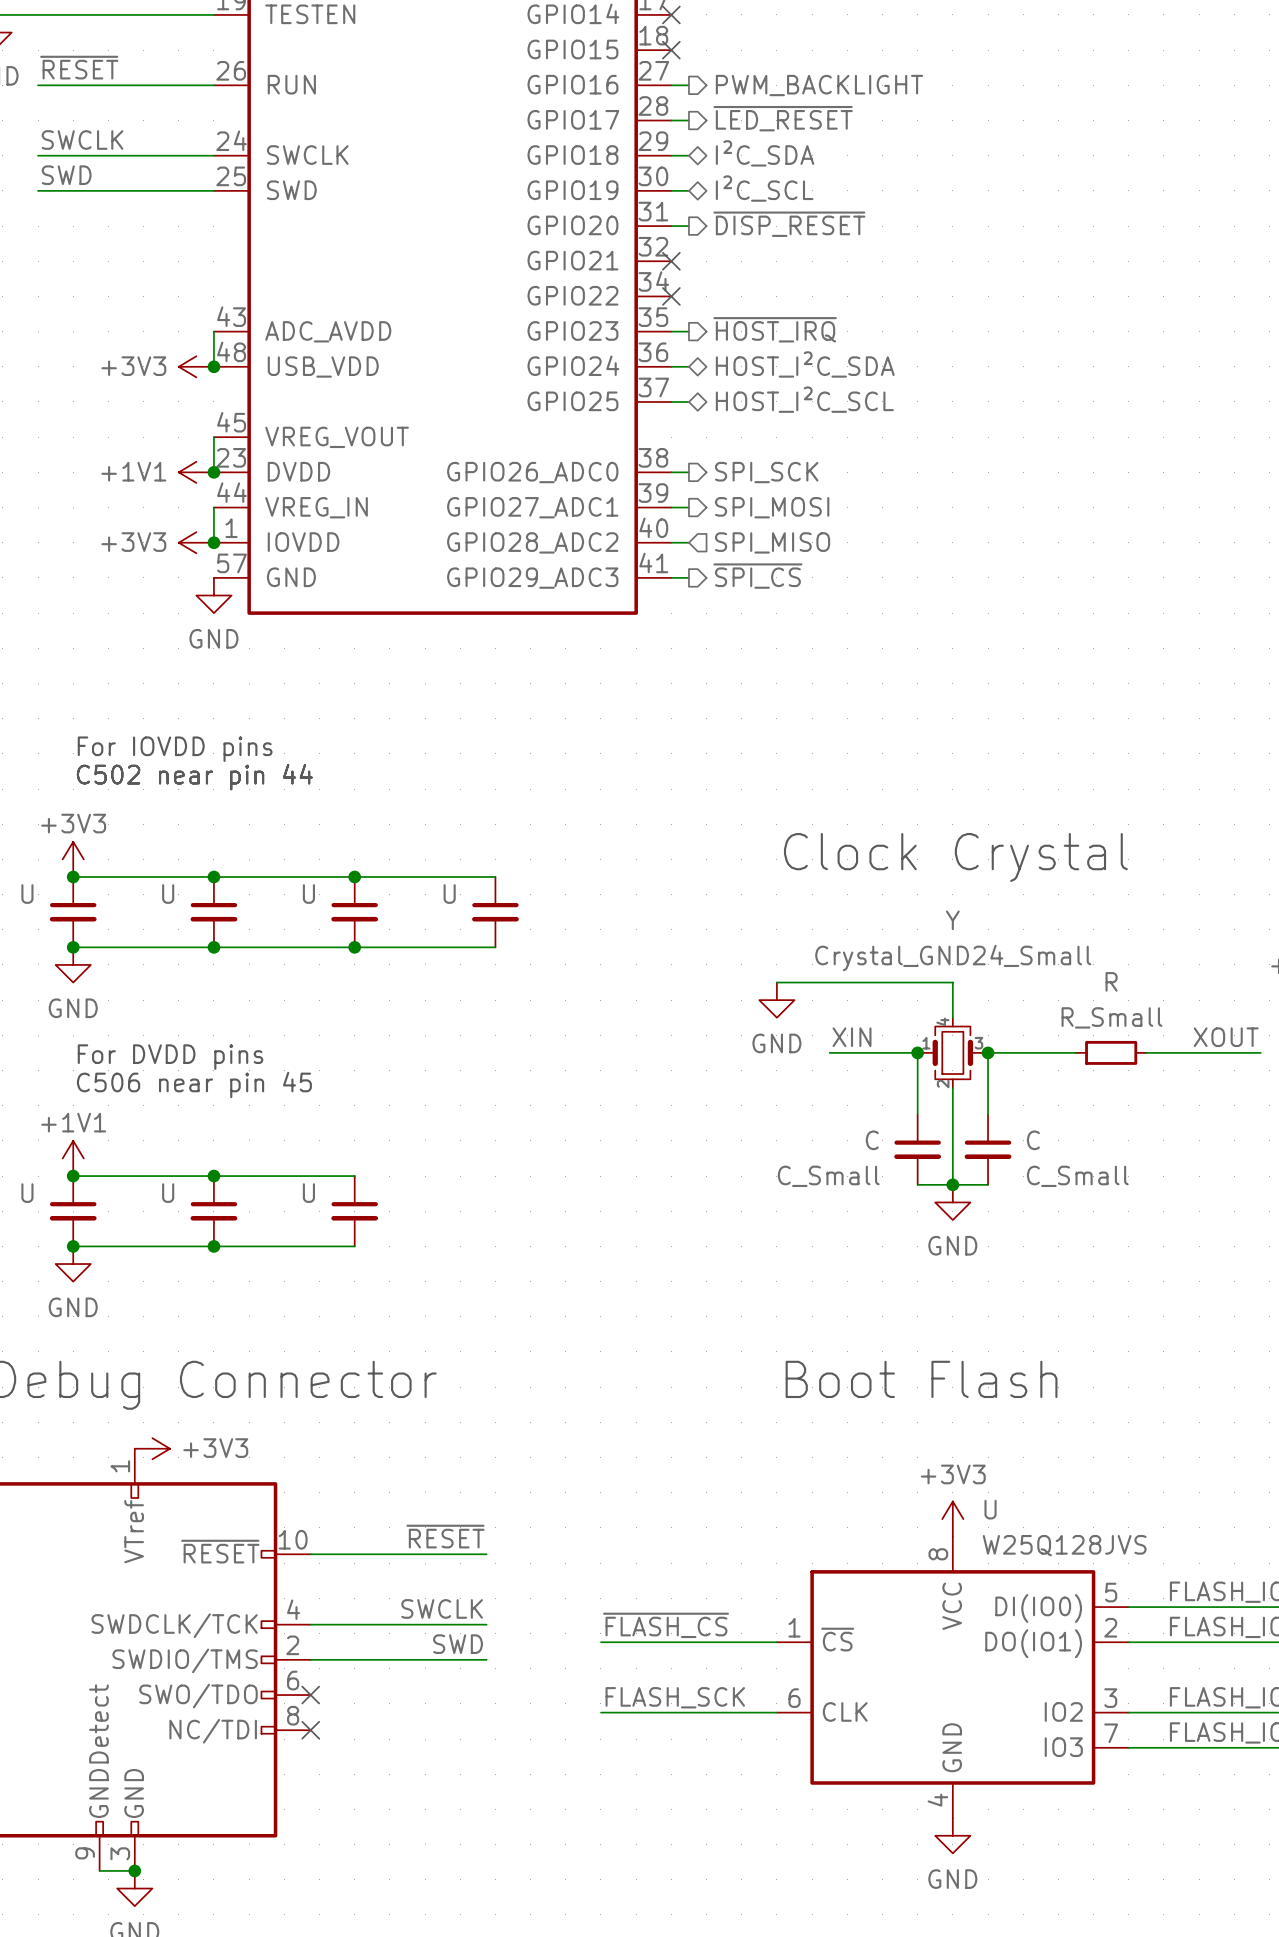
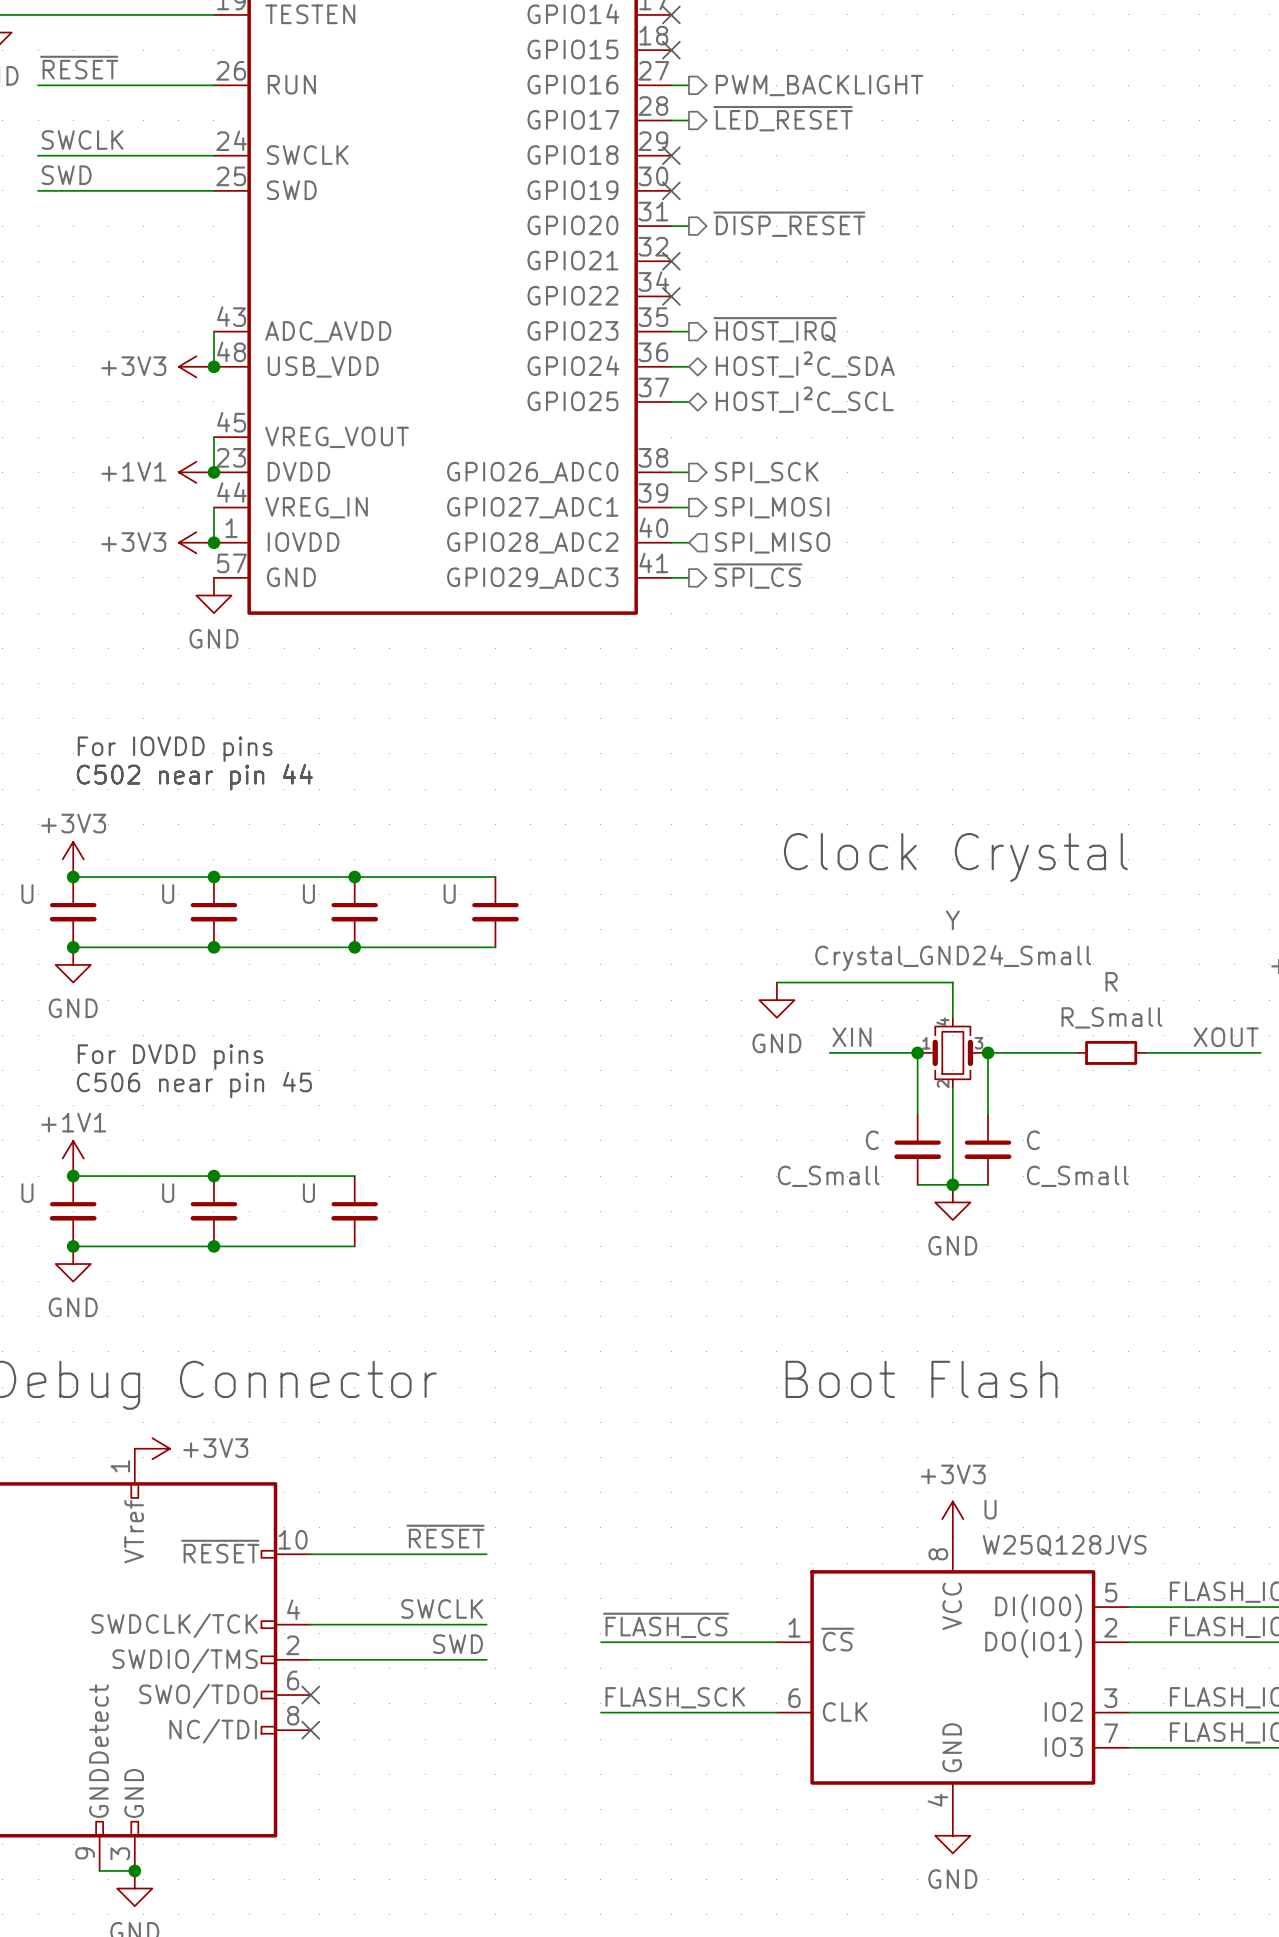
hierarchical label: I²C_SDA (765, 153) -> none
wire: (671, 155) (688, 155) -> none
no-connect mark: none -> (671, 155)
hierarchical label: I²C_SCL (764, 188) -> none
wire: (671, 190) (688, 190) -> none
no-connect mark: none -> (671, 190)

